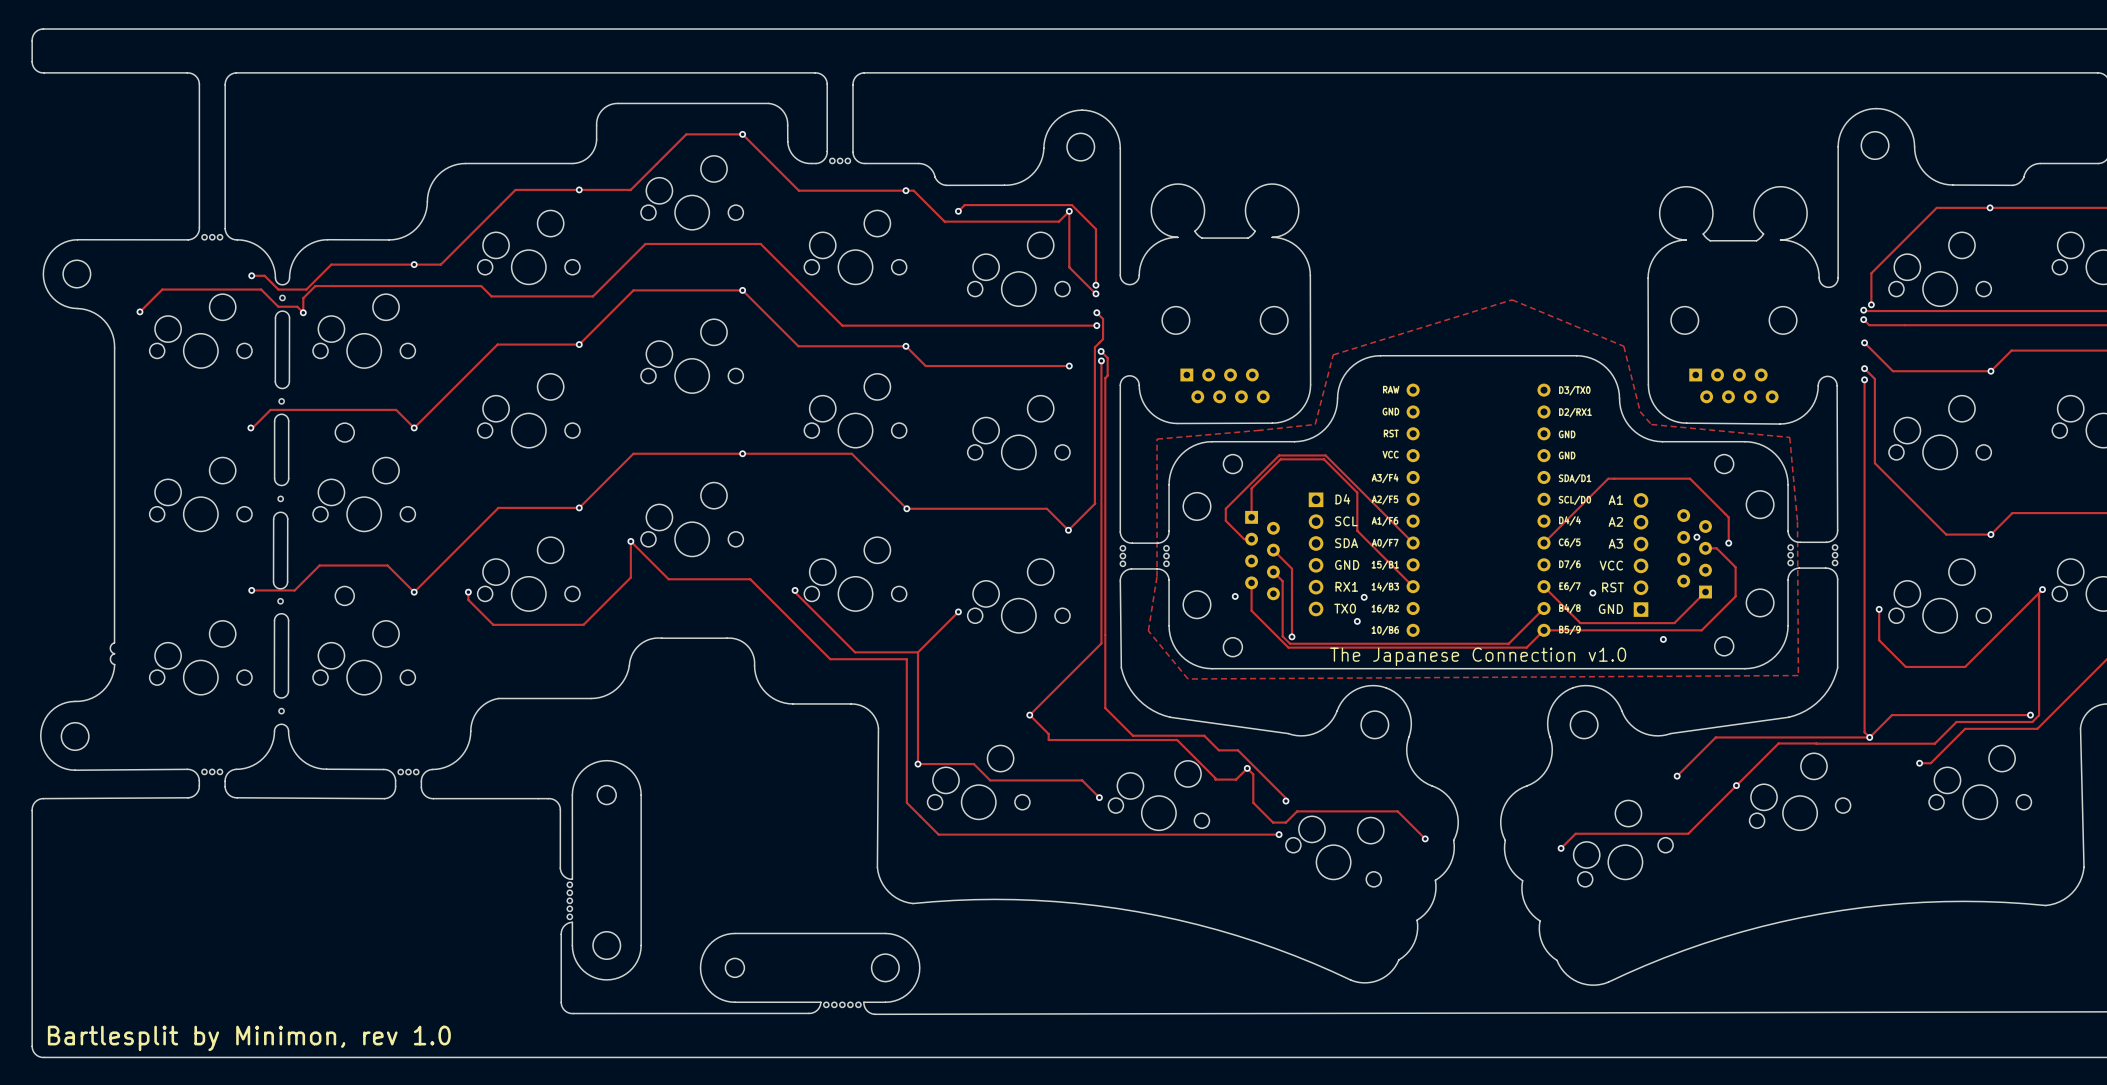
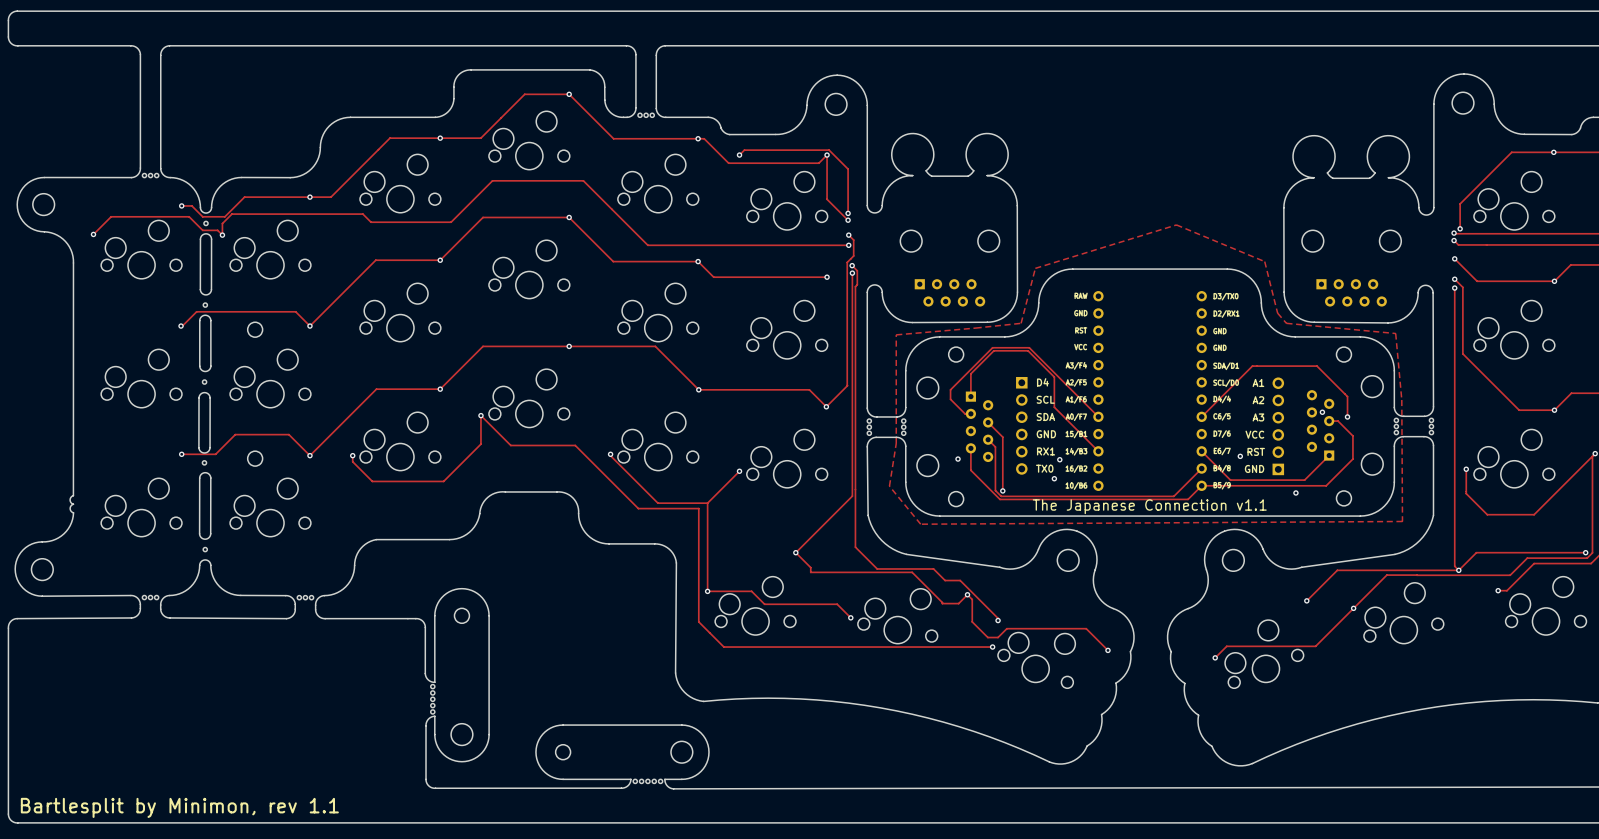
text: The Japanese Connection v1.0 (1478, 656) -> The Japanese Connection v1.1 (1149, 506)
text: Bartlesplit by Minimon, rev 1.0 (249, 1038) -> Bartlesplit by Minimon, rev 1.1 (179, 807)

